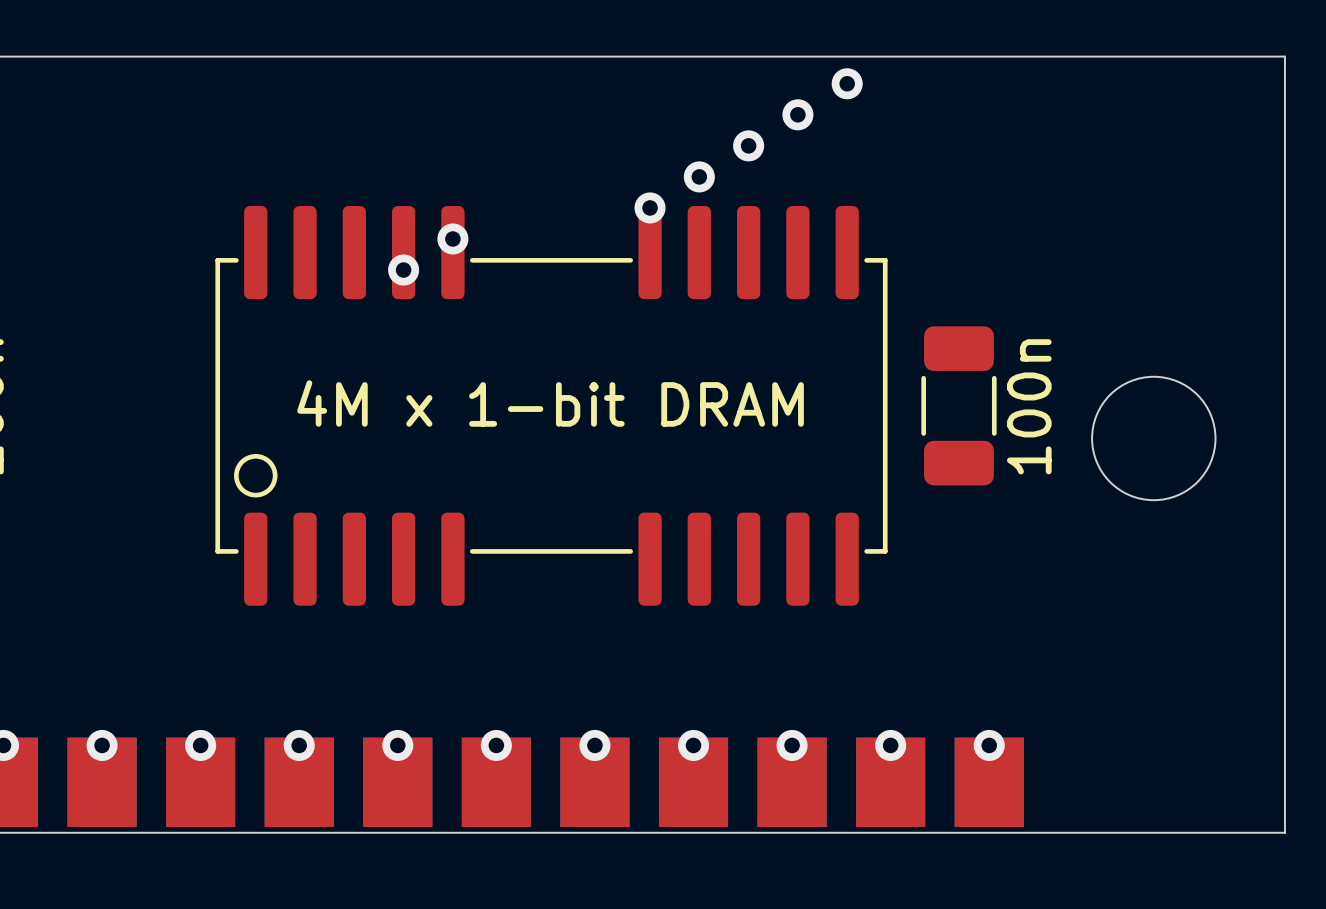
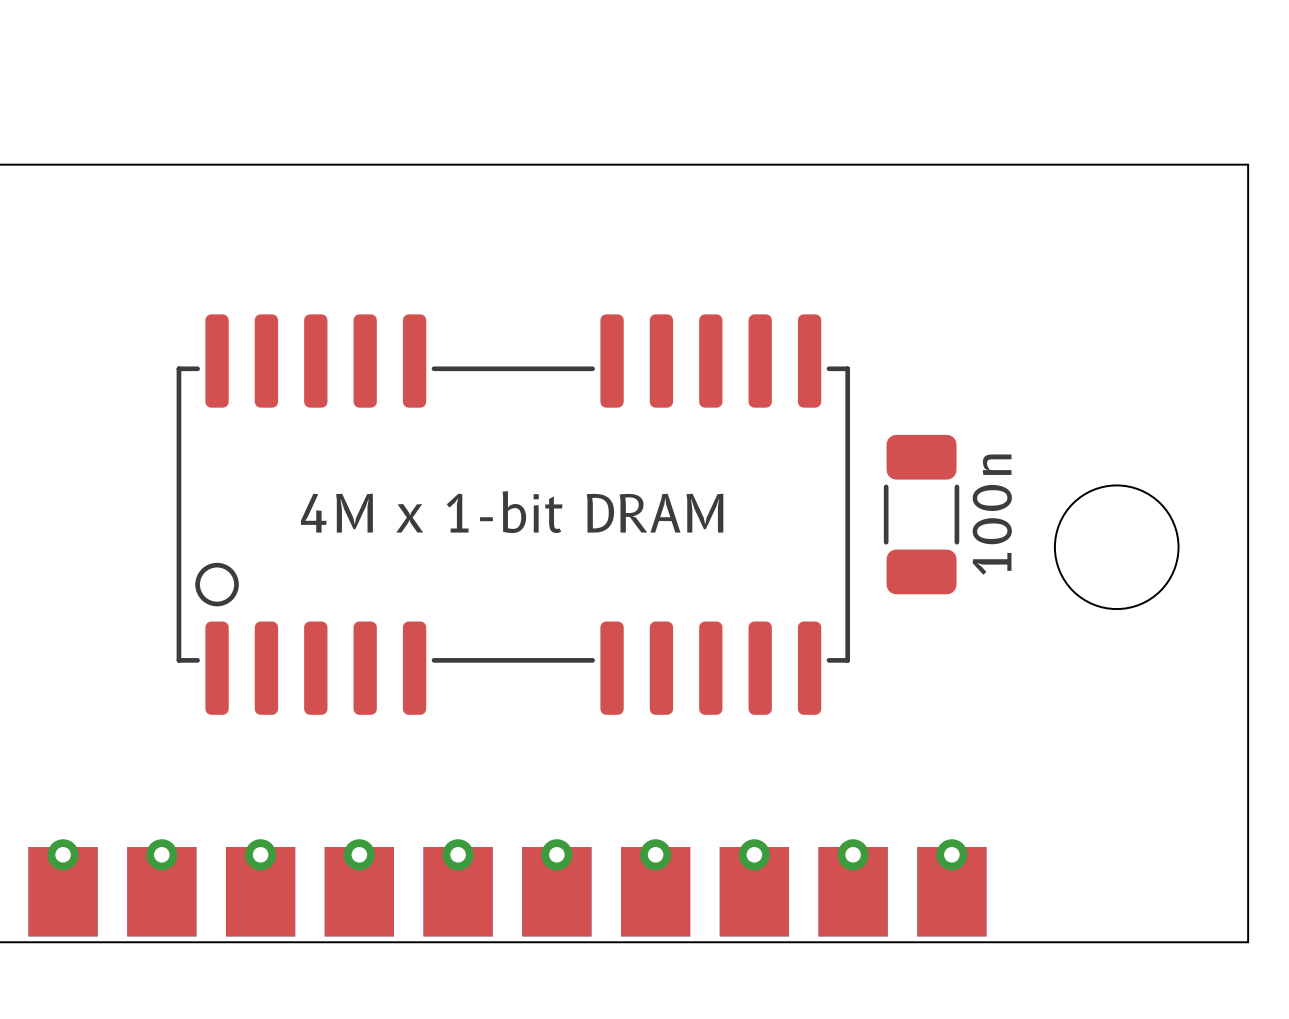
via: (847, 83) -> none
via: (797, 114) -> none
via: (748, 145) -> none
via: (699, 176) -> none
via: (650, 207) -> none
via: (452, 239) -> none
via: (403, 270) -> none

